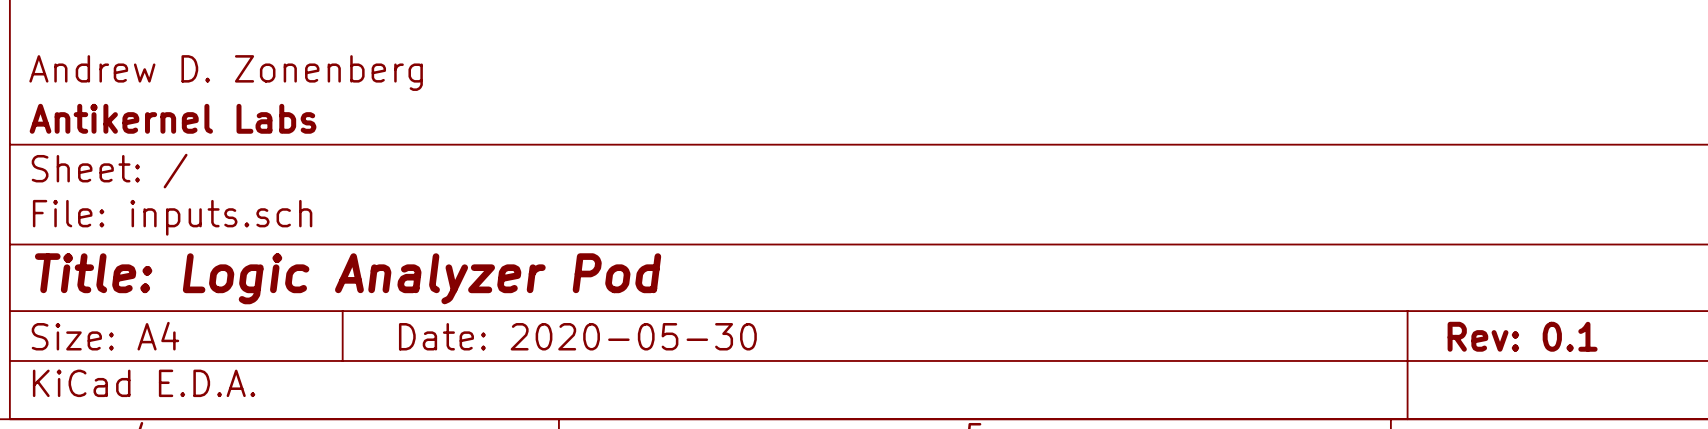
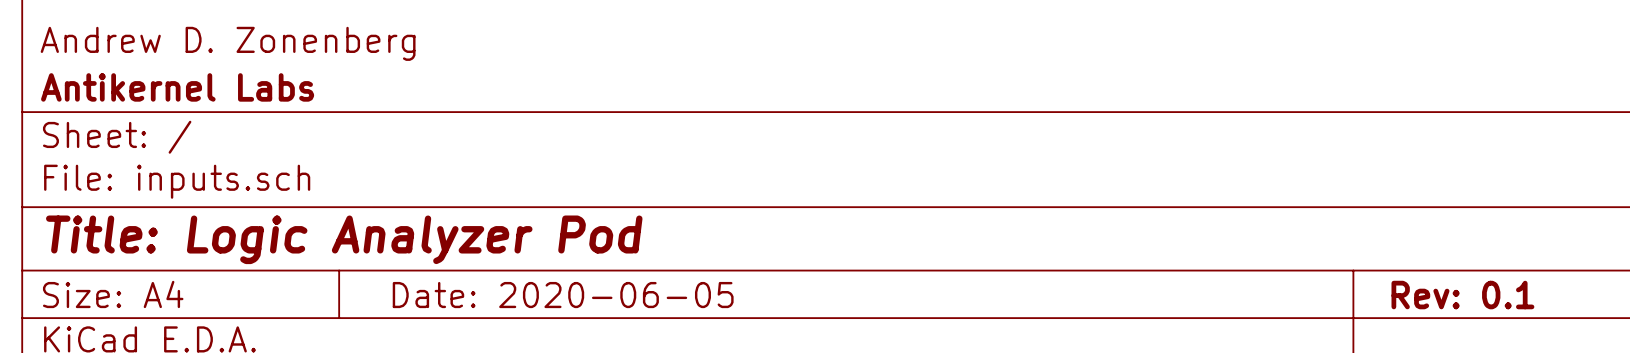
title block: Date: 2020-05-30 (577, 336) -> Date: 2020-06-05 (563, 295)

